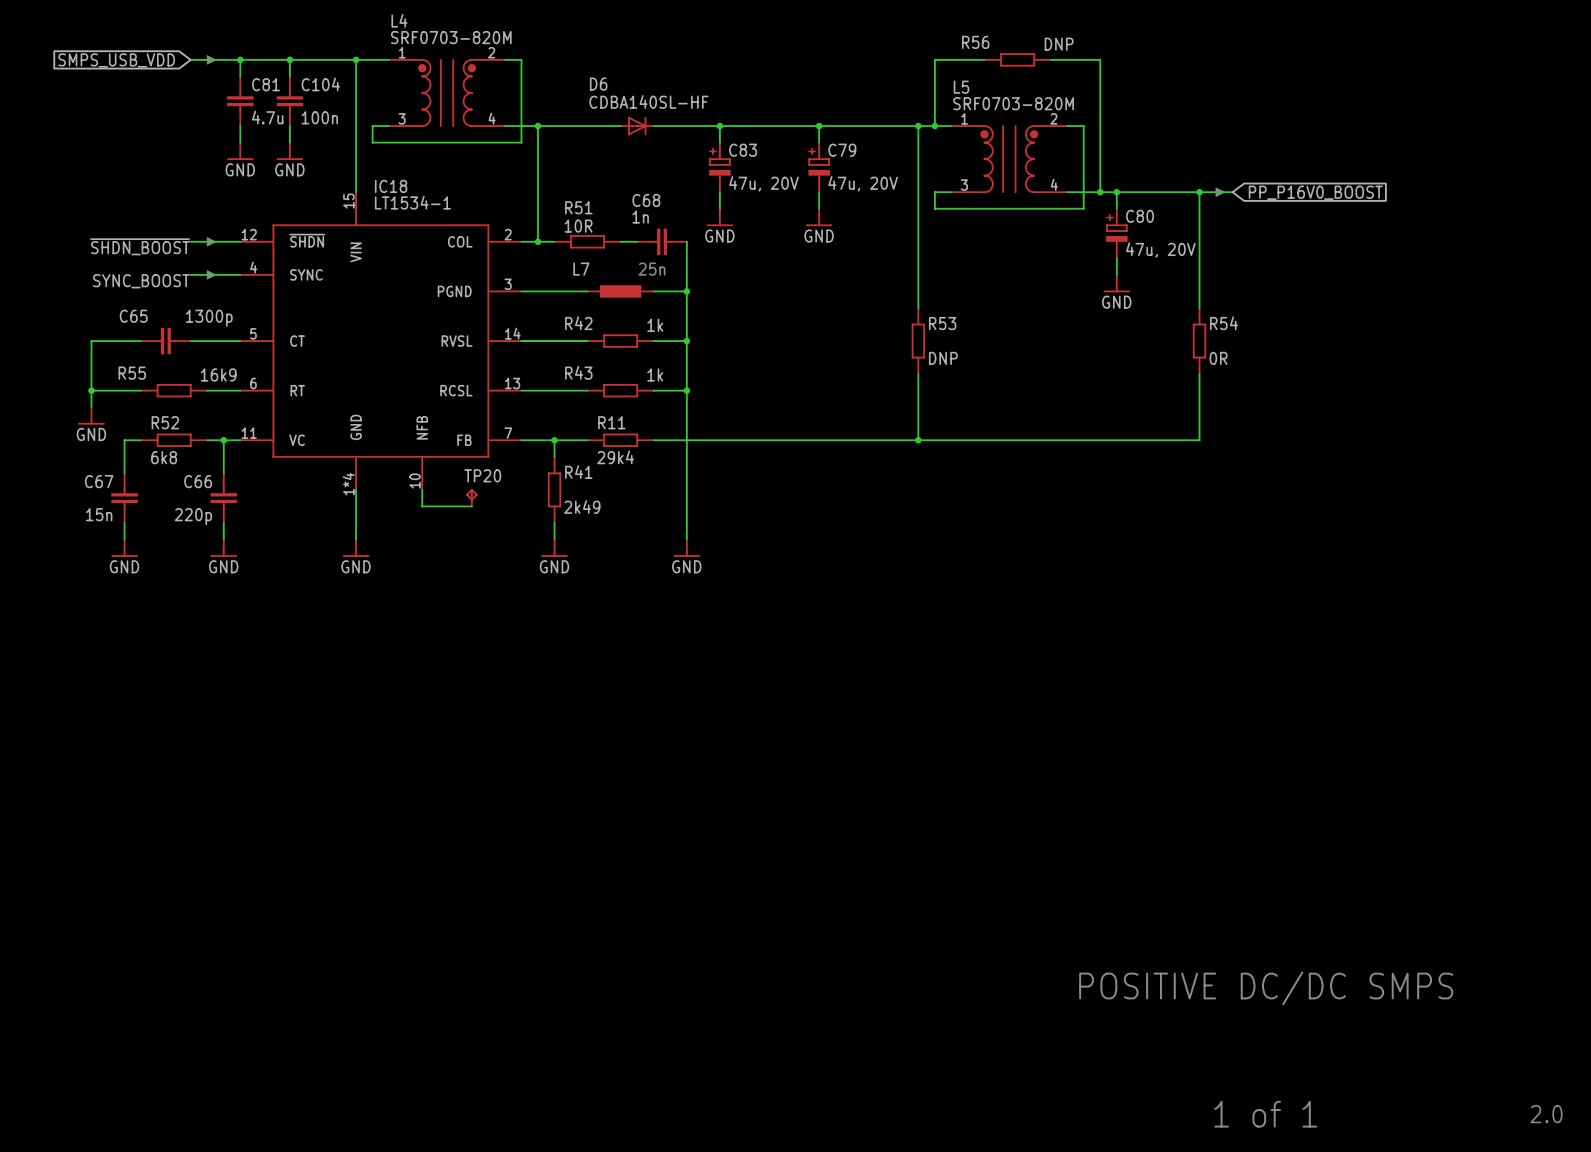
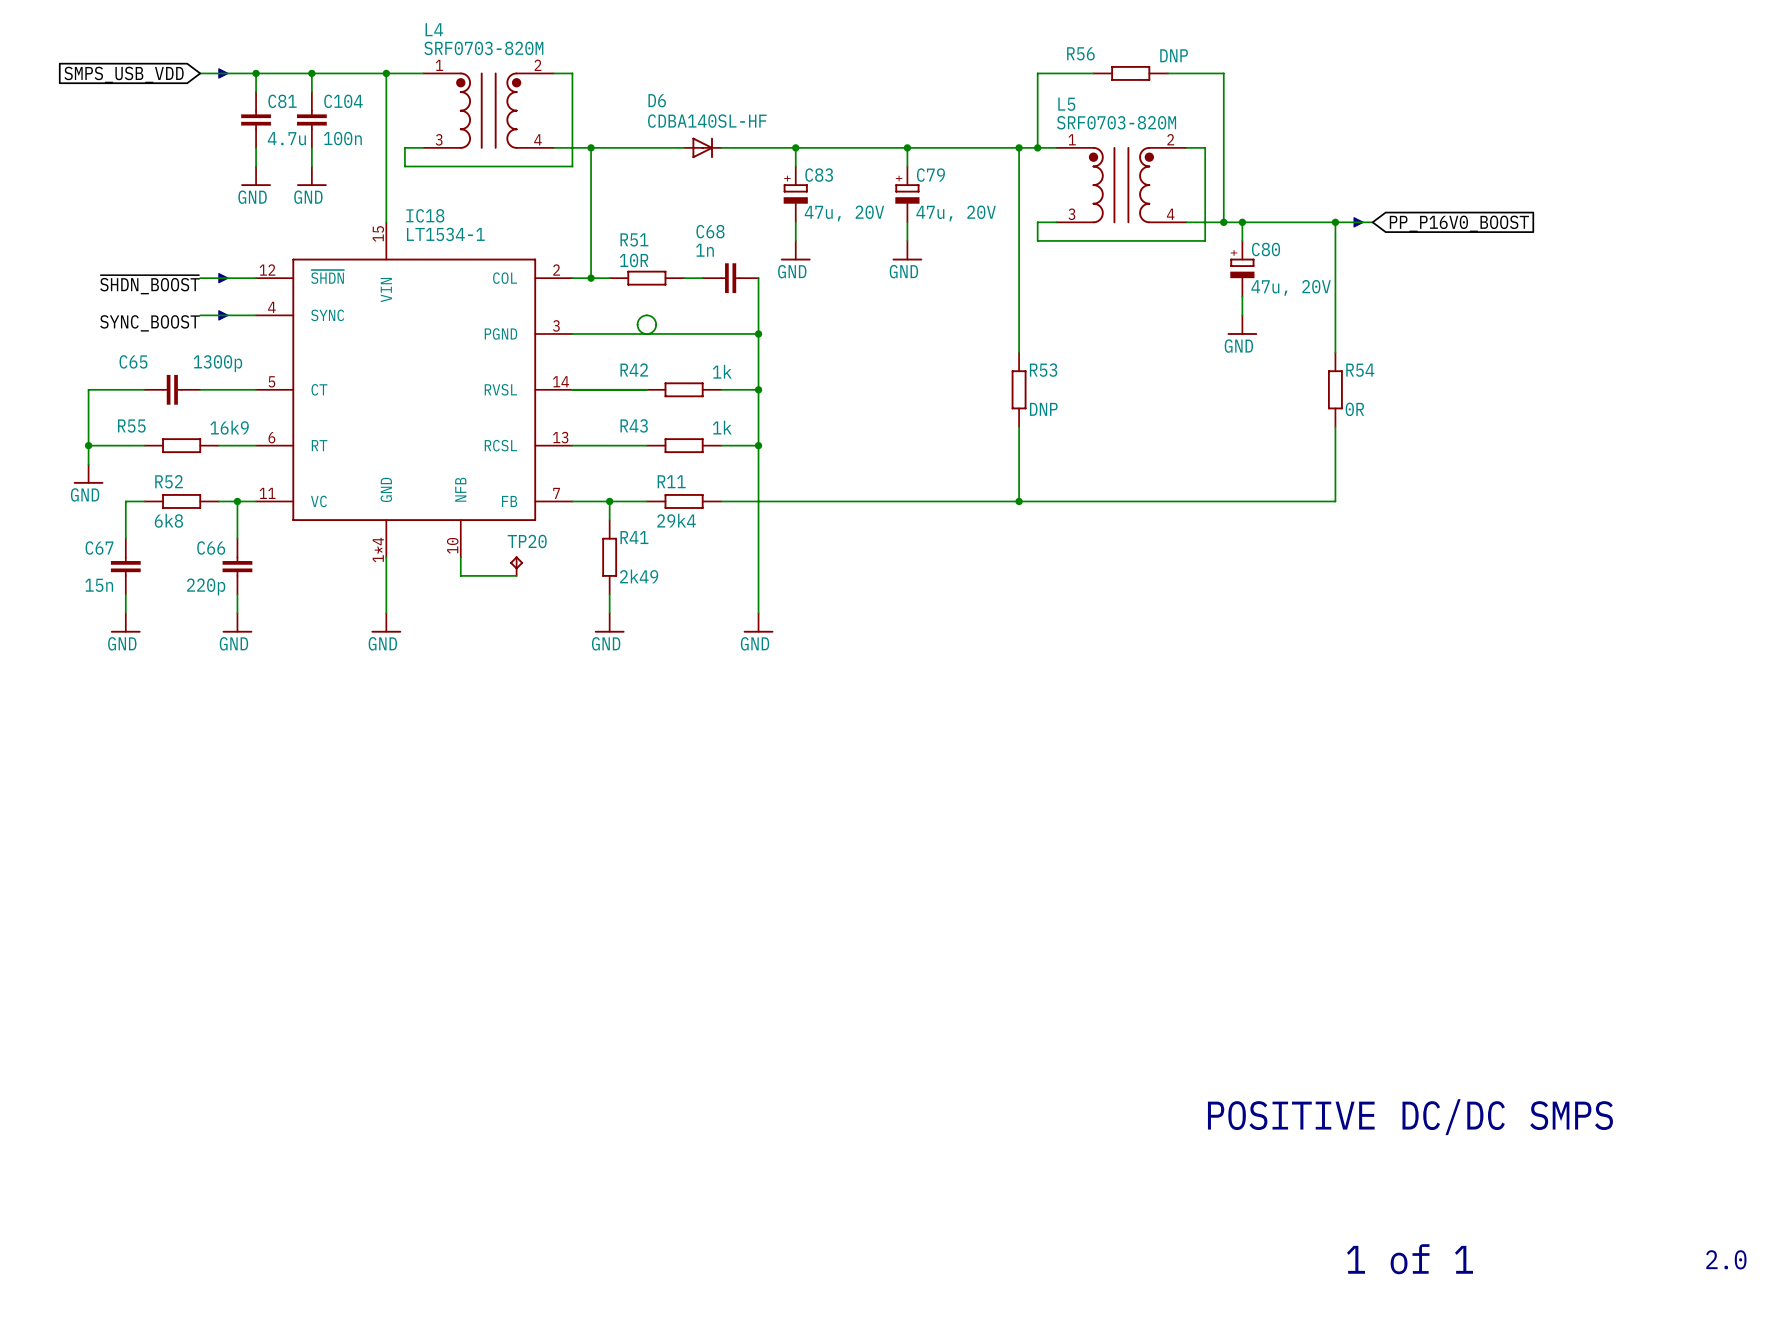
wire: none -> (646, 333) (640, 331) (637, 324) (640, 318) (646, 315) (653, 318) (656, 324) (653, 331) (646, 333)
L7: 25n (620, 291) -> none

